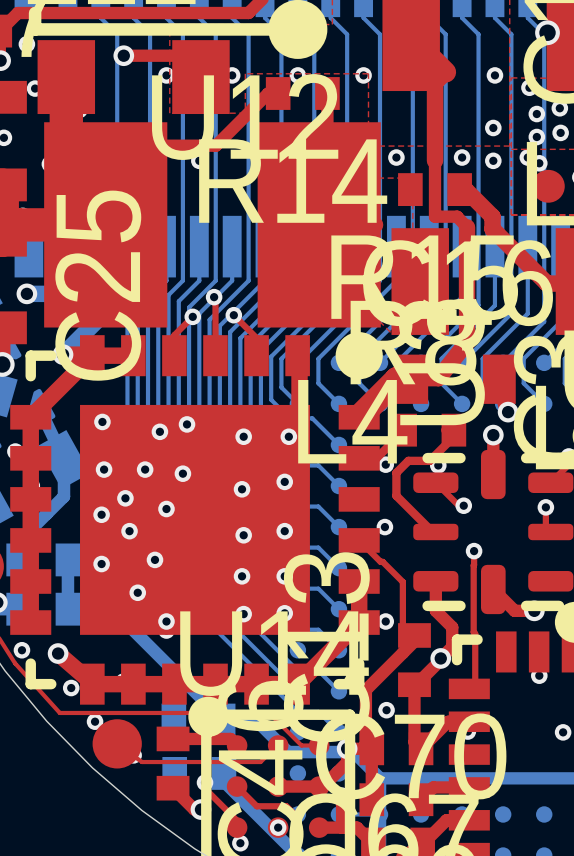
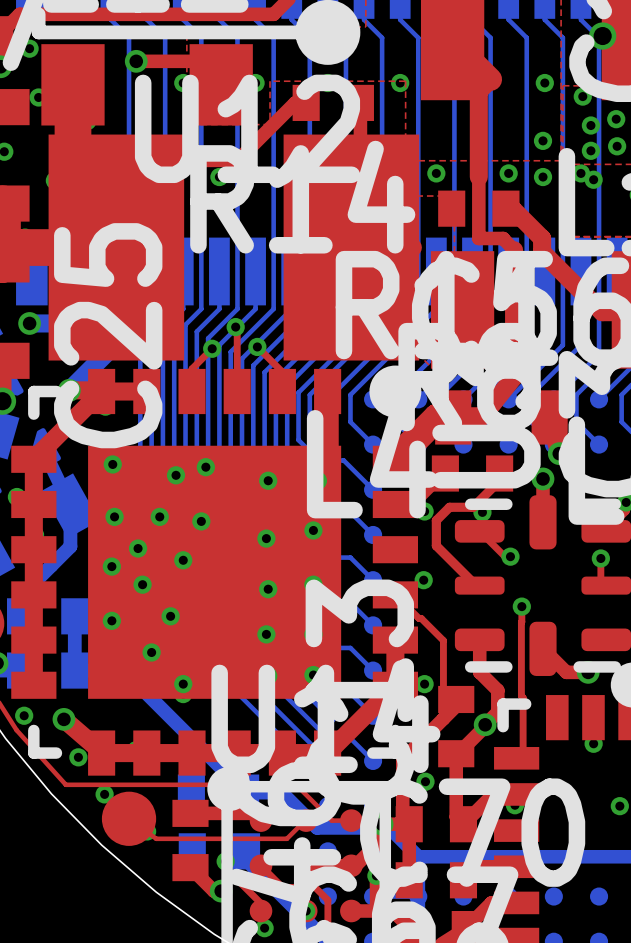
part: (548, 186) -> none

